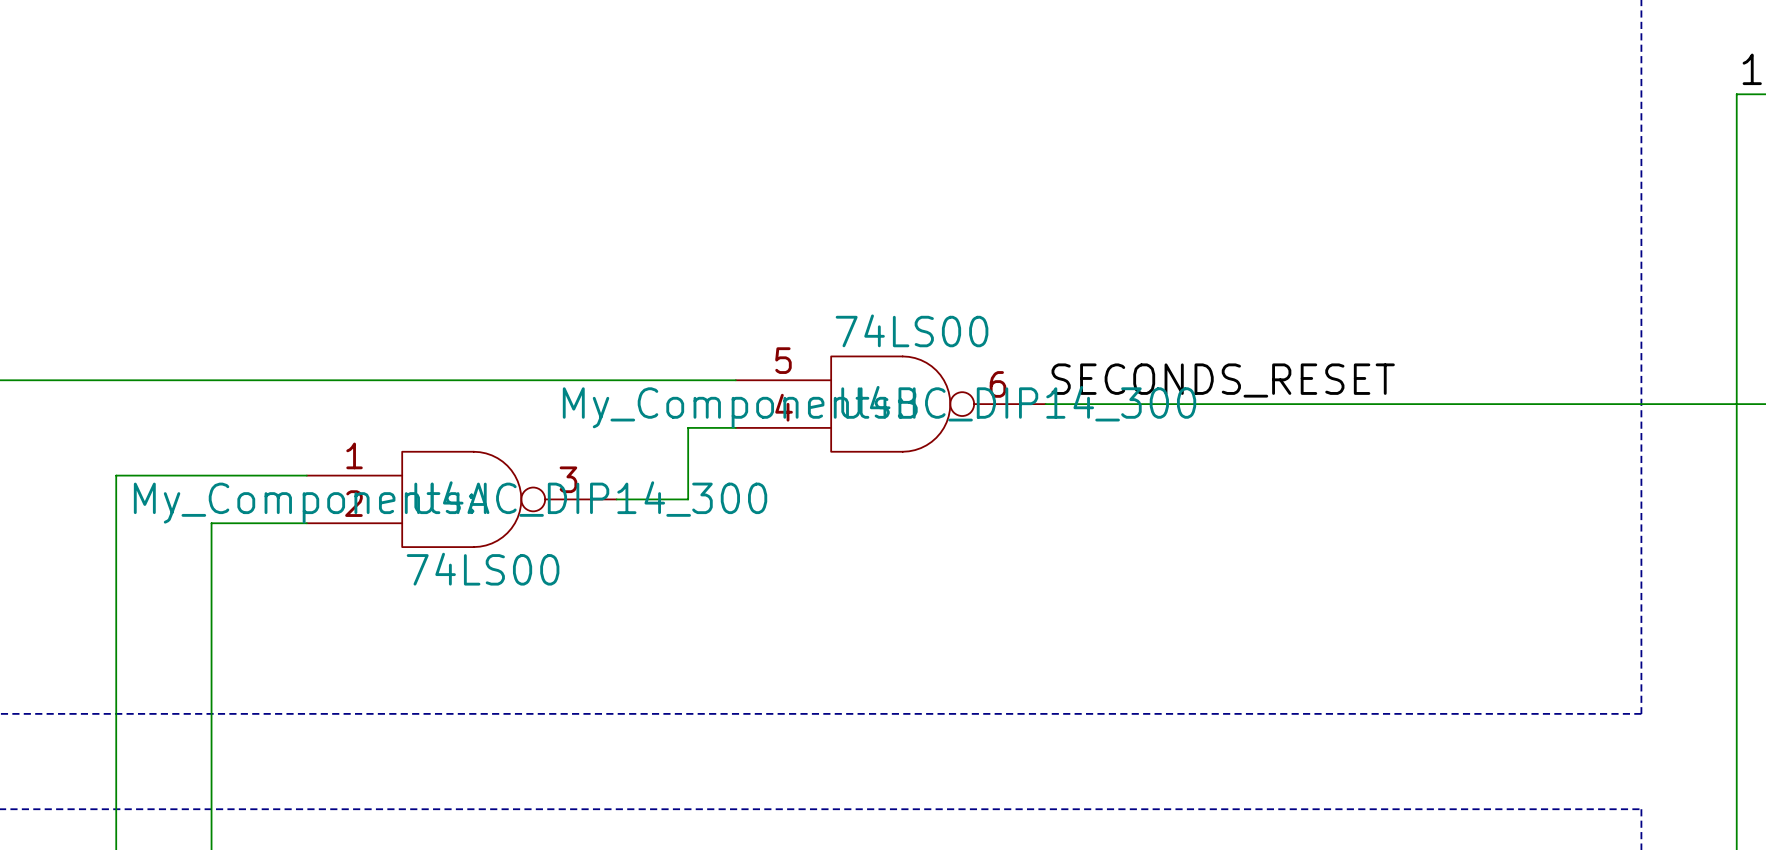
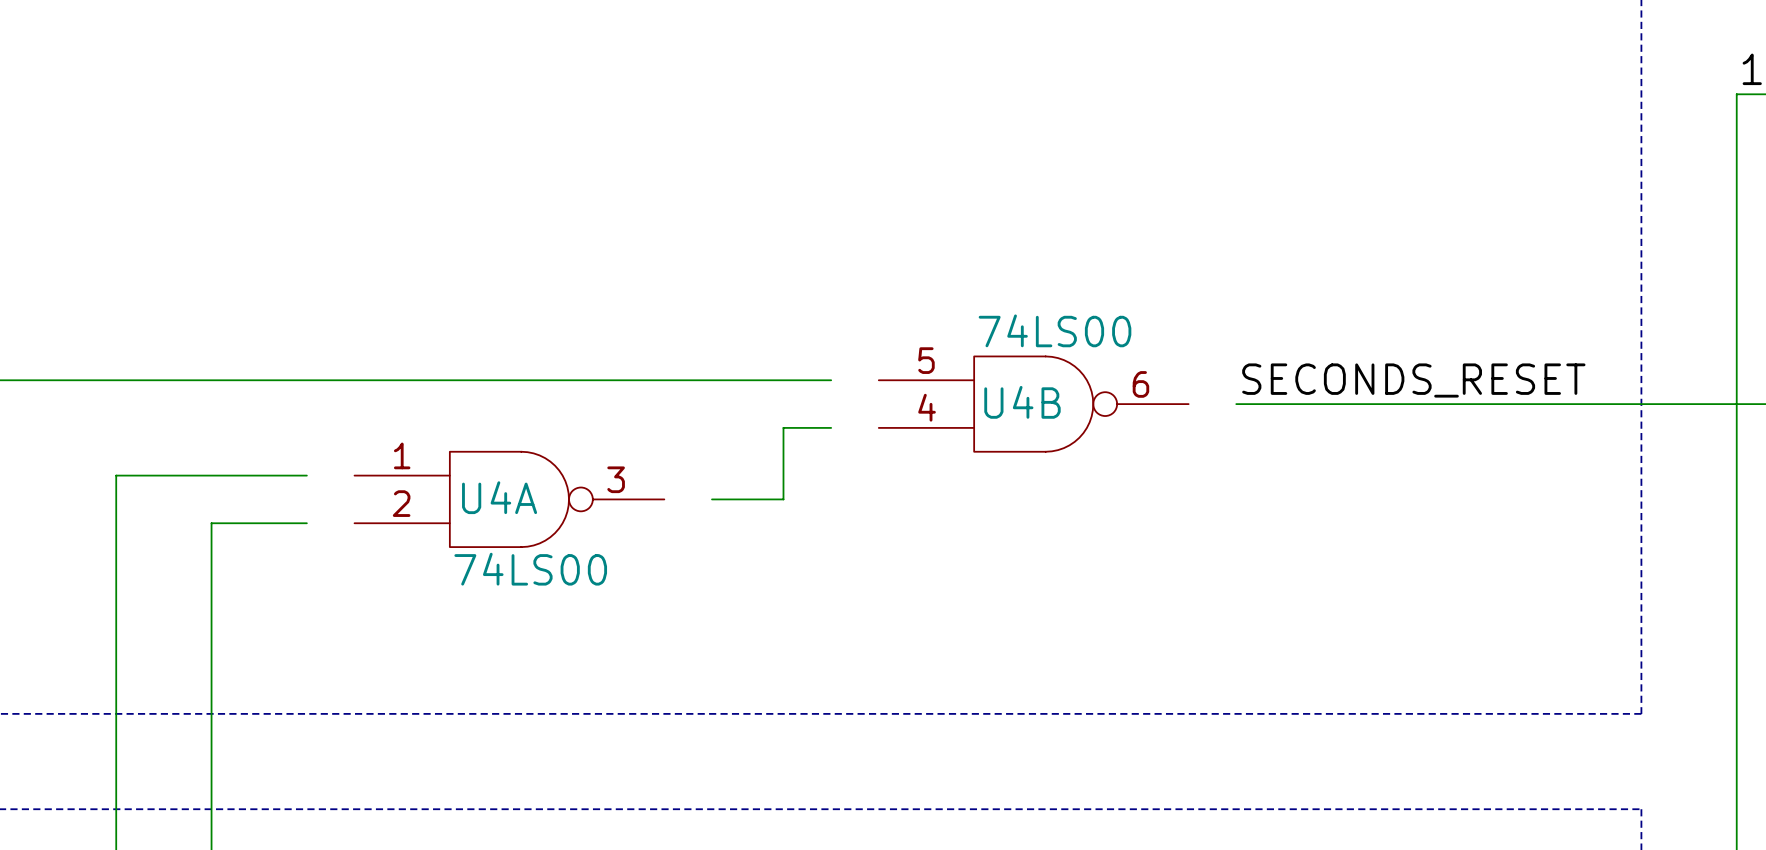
label position: SECONDS_RESET (1223, 380) -> SECONDS_RESET (1413, 380)
U4B position: (890, 404) -> (1033, 404)
wire: (1045, 404) (1236, 404) -> none
U4B text: My_Components:IC_DIP14_300 (879, 407) -> none
wire: (735, 427) (688, 427) (688, 499) (616, 499) -> (831, 427) (783, 427) (783, 499) (711, 499)
U4A position: (461, 499) -> (509, 499)
U4A text: My_Components:IC_DIP14_300 (450, 502) -> none

